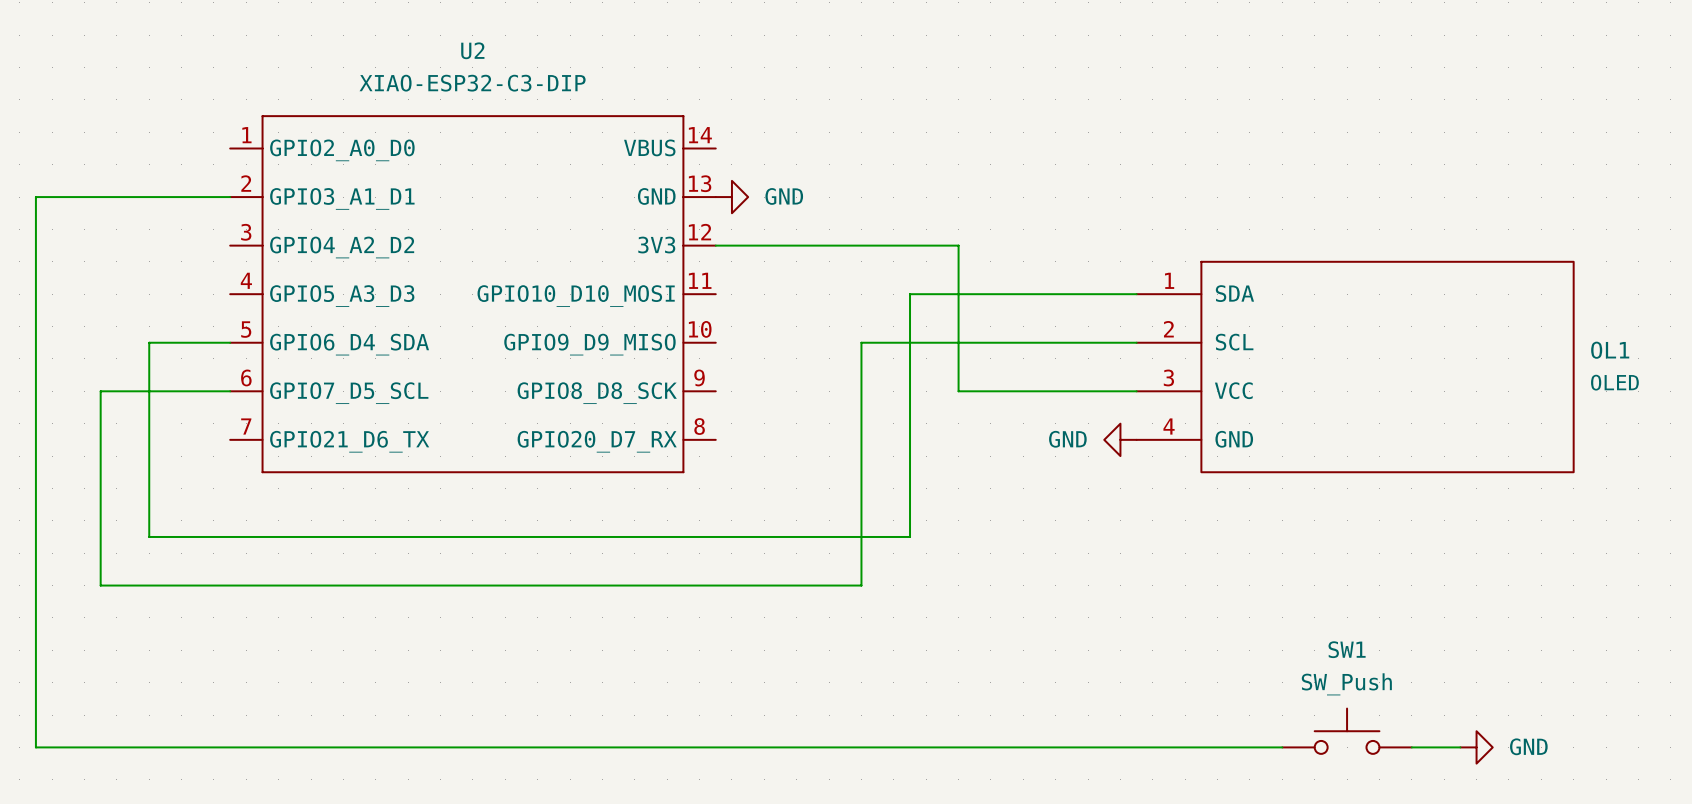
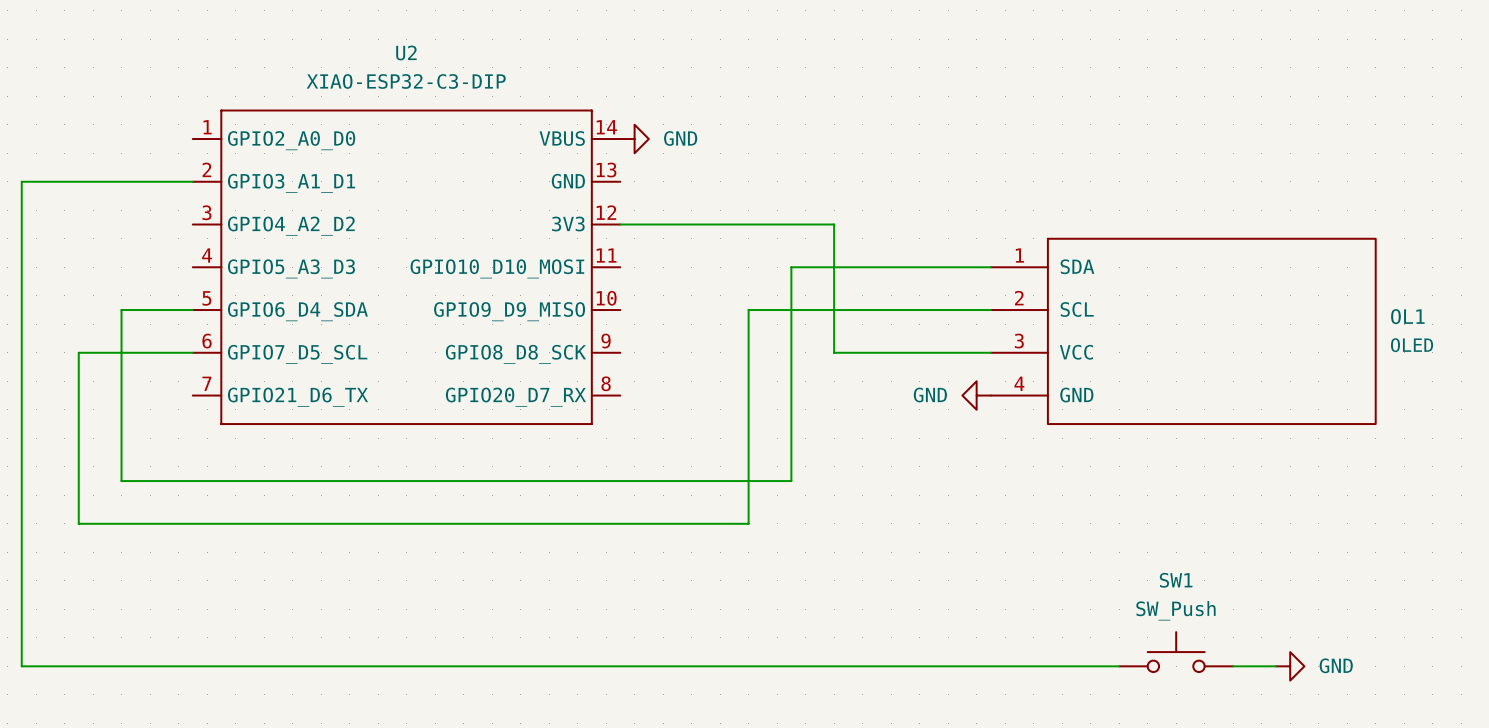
power symbol position: GND (731, 197) -> GND (634, 139)

